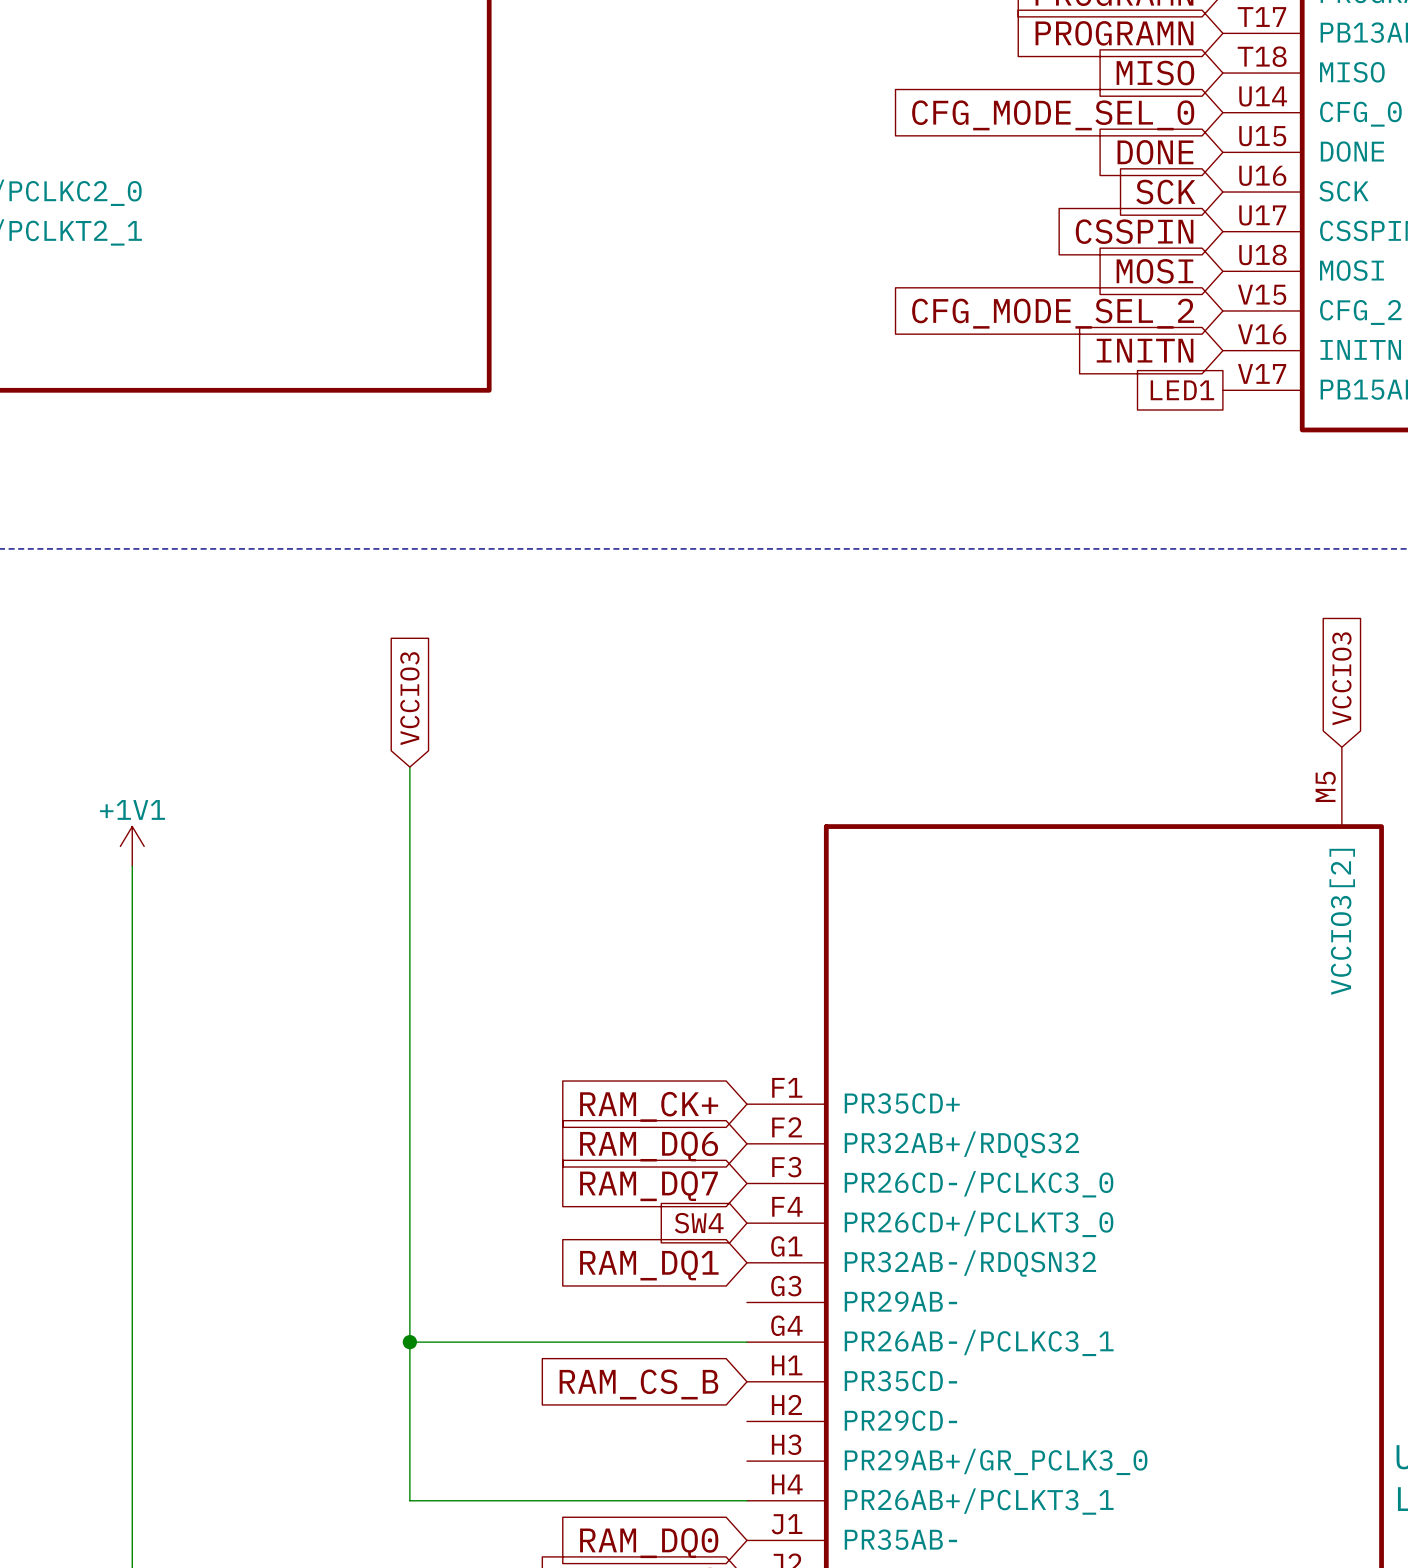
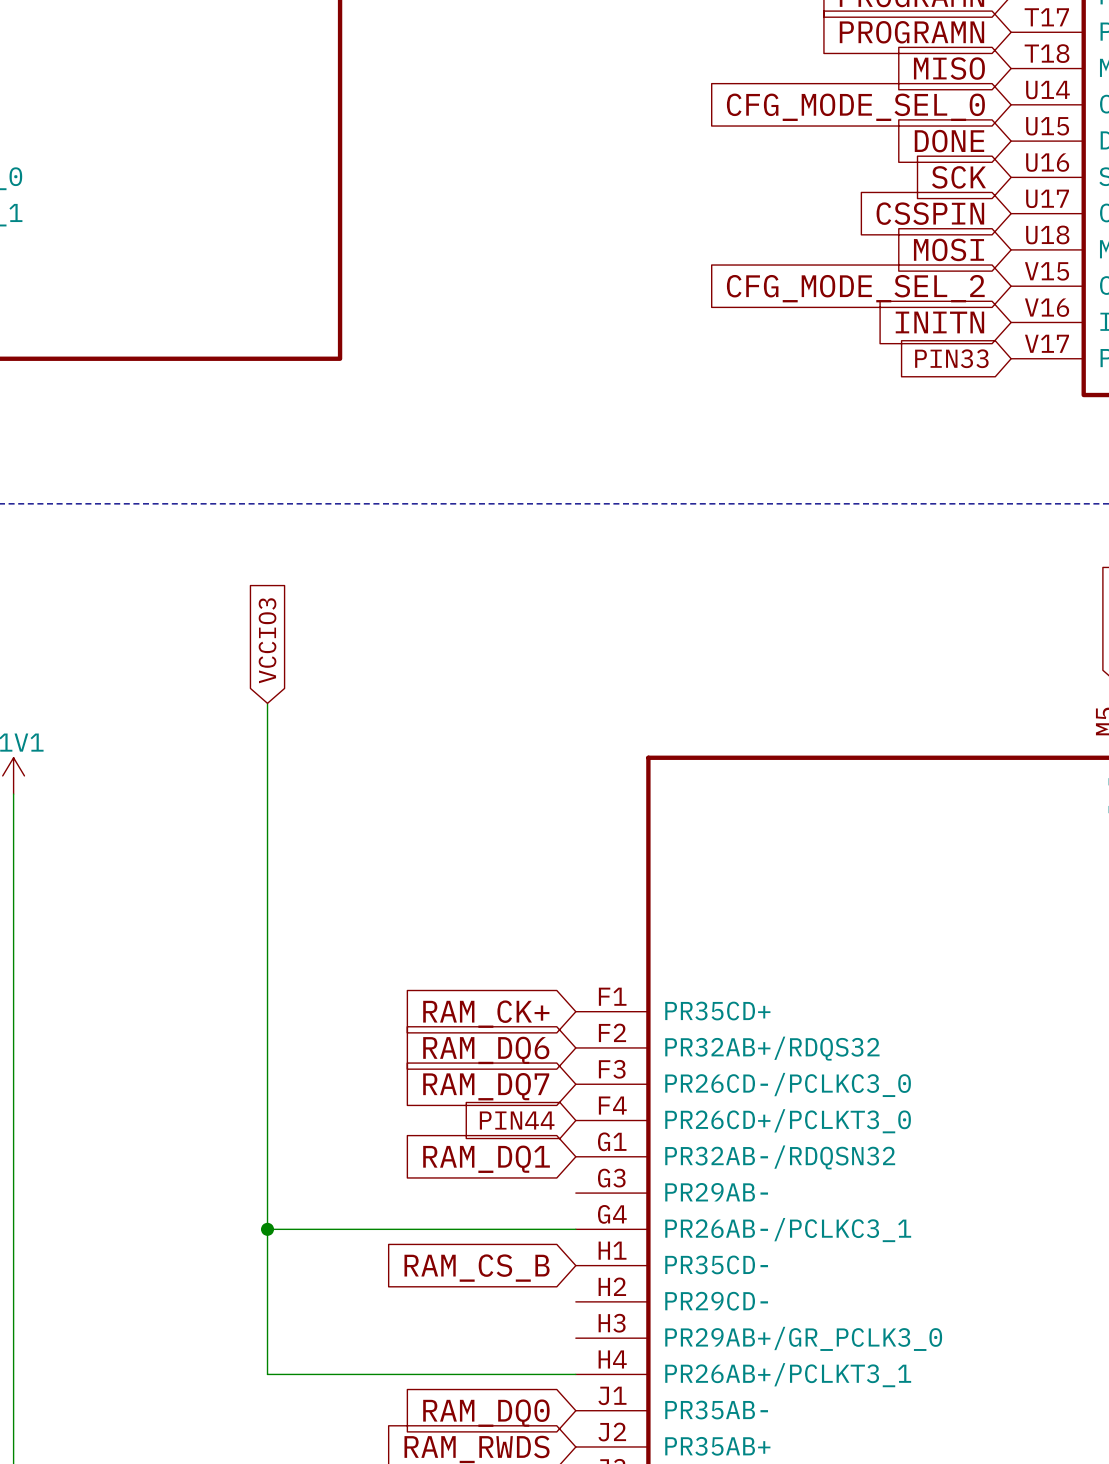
global label shape: passive (1182, 390) -> input (951, 358)
global label: LED1 (1182, 390) -> PIN33 (951, 358)
global label: SW4 (699, 1223) -> PIN44 (517, 1120)

